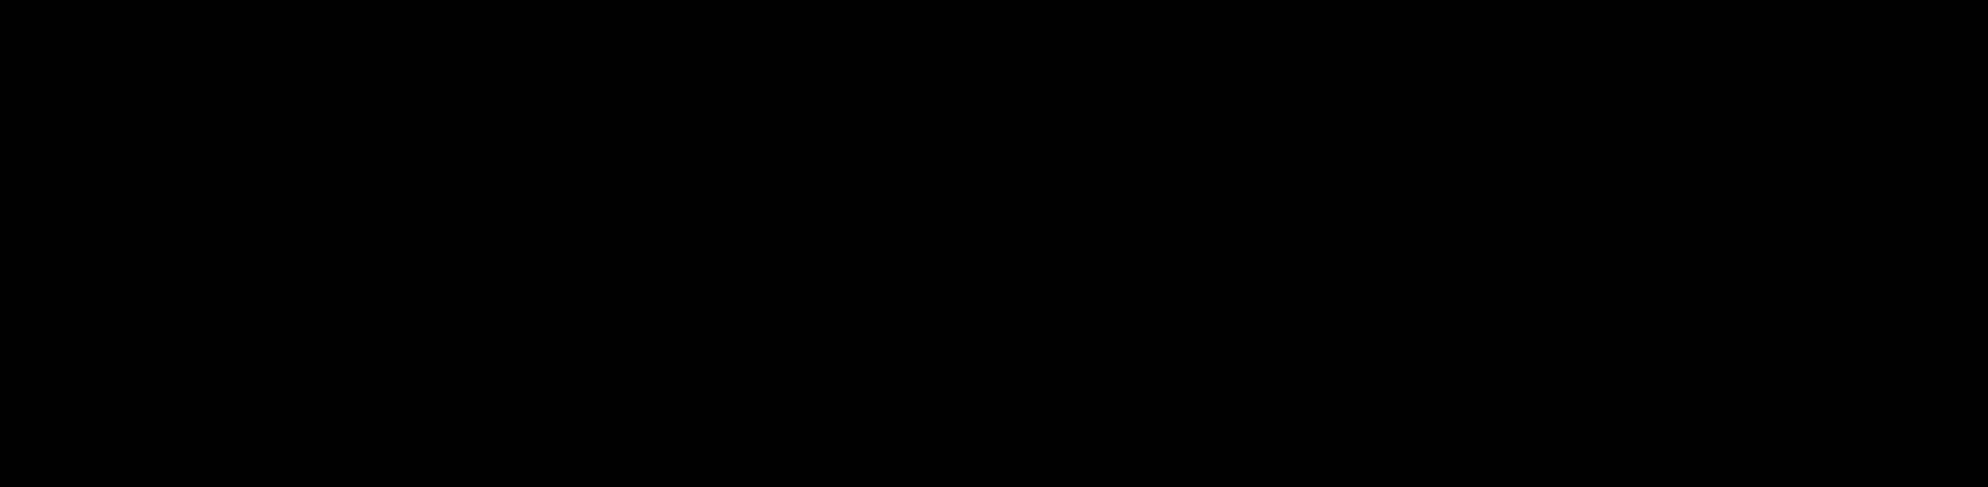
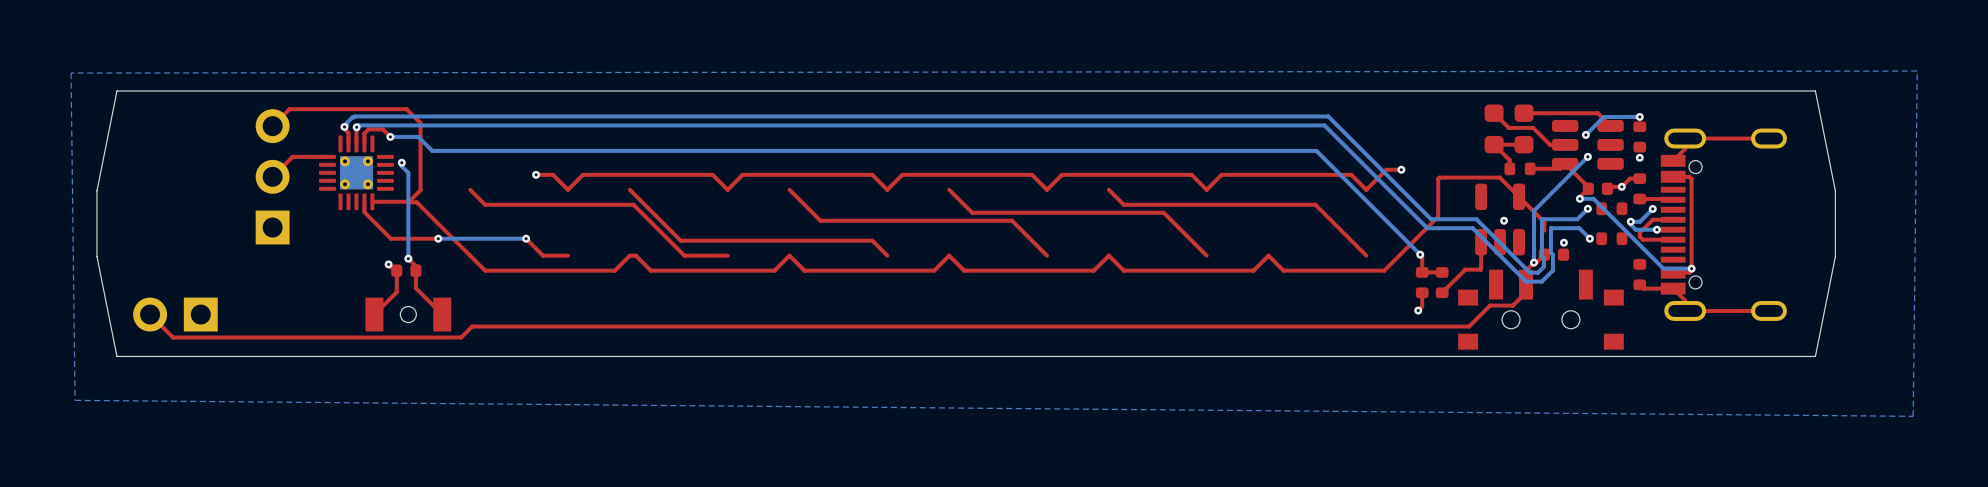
bottom zone outline: none -> (1917, 71) (71, 73) (75, 400) (1913, 416) (1917, 71)
board edge: none -> (1815, 91) (1835, 190) (1835, 256) (1815, 356) (116, 356) (97, 256) (97, 190) (116, 91) (1815, 91)
top track: none -> (1494, 113) (1508, 127) (1533, 127) (1550, 144) (1565, 144)
top track: none -> (1524, 113) (1597, 113) (1610, 125)
bottom track: none -> (1639, 116) (1603, 116) (1585, 134)
via: none -> (1639, 116)
top track: none -> (272, 126) (289, 109) (406, 109) (420, 123) (420, 190) (408, 202)
bottom track: none -> (344, 126) (354, 116) (1328, 116) (1431, 219) (1476, 219) (1529, 272) (1538, 272) (1543, 266) (1543, 258) (1541, 256) (1541, 219) (1577, 219) (1587, 208)
via: none -> (344, 126)
bottom track: none -> (356, 127) (358, 125) (1324, 125) (1427, 228) (1472, 228) (1526, 281) (1541, 281) (1552, 270) (1550, 228) (1579, 228) (1589, 238)
via: none -> (356, 127)
top track: none -> (344, 128) (342, 126) (348, 132) (348, 143)
top track: none -> (356, 128) (356, 143)
part: none -> (1494, 128)
part: none -> (1524, 128)
via: none -> (1585, 134)
top track: none -> (390, 136) (382, 129) (368, 129) (364, 133) (364, 143)
bottom track: none -> (390, 136) (418, 136) (432, 150) (1316, 150) (1420, 254)
via: none -> (390, 136)
part: none -> (1639, 136)
top track: none -> (1769, 138) (1685, 138) (1685, 148) (1673, 160)
top track: none -> (1524, 144) (1494, 144) (1509, 160) (1509, 168)
part: none -> (1587, 144)
top track: none -> (327, 156) (292, 156) (272, 176)
bottom track: none -> (1587, 156) (1534, 210) (1534, 262)
via: none -> (1587, 156)
via: none -> (1639, 157)
bottom track: none -> (401, 162) (401, 166) (408, 172) (408, 258)
via: none -> (401, 162)
part: none -> (1520, 168)
top track: none -> (1530, 168) (1560, 168) (1565, 163) (1588, 186) (1579, 198)
top track: none -> (1401, 169) (1386, 169) (1366, 189) (1351, 174) (1221, 174) (1206, 189) (1191, 174) (1061, 174) (1047, 189) (1032, 174) (902, 174) (887, 189) (872, 174) (742, 174) (727, 189) (712, 174) (582, 174) (568, 189) (553, 174) (536, 174)
via: none -> (1401, 169)
part: none -> (356, 172)
via: none -> (536, 174)
part: none -> (272, 176)
top track: none -> (1673, 176) (1689, 176) (1691, 178) (1691, 270) (1689, 272) (1673, 272)
top track: none -> (1639, 178) (1629, 178) (1621, 186) (1609, 186) (1607, 188)
via: none -> (1621, 186)
part: none -> (1597, 188)
part: none -> (1639, 188)
top track: none -> (470, 189) (485, 204) (633, 204) (684, 255) (727, 255)
top track: none -> (629, 189) (680, 240) (872, 240) (887, 255)
top track: none -> (789, 189) (820, 220) (1012, 220) (1047, 255)
top track: none -> (949, 189) (972, 212) (1163, 212) (1206, 255)
top track: none -> (1108, 189) (1123, 204) (1315, 204) (1366, 255)
bottom track: none -> (1579, 198) (1593, 198) (1663, 268) (1691, 268)
via: none -> (1579, 198)
top track: none -> (1639, 198) (1673, 199)
top track: none -> (364, 201) (364, 212) (390, 238) (438, 238)
top track: none -> (372, 201) (408, 202)
top track: none -> (408, 202) (416, 202) (485, 270) (614, 270) (629, 255) (635, 255) (650, 270) (774, 270) (789, 255) (804, 270) (934, 270) (949, 255) (964, 270) (1093, 270) (1108, 255) (1123, 270) (1253, 270) (1268, 255) (1283, 270) (1384, 270) (1438, 216) (1439, 177) (1499, 177) (1544, 222) (1544, 230)
via: none -> (1587, 208)
part: none -> (1611, 208)
bottom track: none -> (1652, 208) (1640, 221) (1630, 221) (1630, 224) (1635, 229) (1656, 229)
via: none -> (1652, 208)
part: none -> (1500, 219)
top track: none -> (1673, 219) (1652, 219) (1639, 232) (1639, 236) (1642, 239) (1673, 239)
via: none -> (1504, 220)
via: none -> (1630, 221)
part: none -> (1723, 224)
via: none -> (1656, 229)
via: none -> (438, 238)
top track: none -> (526, 238) (543, 255) (568, 255)
bottom track: none -> (526, 238) (438, 238)
via: none -> (526, 238)
via: none -> (1589, 238)
part: none -> (1611, 238)
top track: none -> (1481, 242) (1481, 269) (1465, 269) (1442, 292)
via: none -> (1563, 242)
top track: none -> (1420, 254) (1422, 256) (1422, 272) (1442, 272)
via: none -> (1420, 254)
top track: none -> (1544, 254) (1526, 270) (1526, 292) (1513, 305) (1490, 305) (1469, 326) (472, 326) (461, 337) (173, 337) (150, 314)
part: none -> (1553, 254)
top track: none -> (408, 258) (415, 266) (415, 288) (442, 314)
via: none -> (408, 258)
via: none -> (1534, 262)
top track: none -> (388, 264) (396, 270) (396, 292) (374, 314)
via: none -> (388, 264)
via: none -> (1691, 268)
part: none -> (406, 270)
part: none -> (1639, 274)
part: none -> (1422, 282)
part: none -> (1442, 282)
top track: none -> (1639, 284) (1643, 288) (1673, 288) (1685, 300) (1685, 310) (1769, 310)
top track: none -> (1422, 292) (1422, 306) (1418, 310)
part: none -> (1540, 309)
via: none -> (1418, 310)
part: none -> (175, 314)
part: none -> (408, 314)

